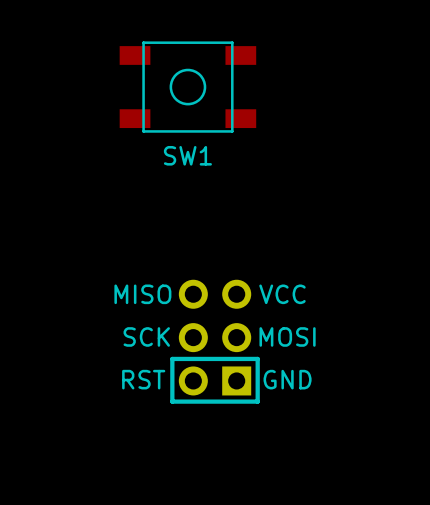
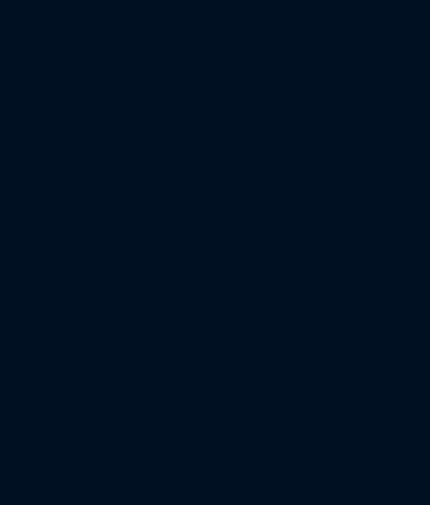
SW1: (187, 87) -> none
part: (215, 341) -> none

